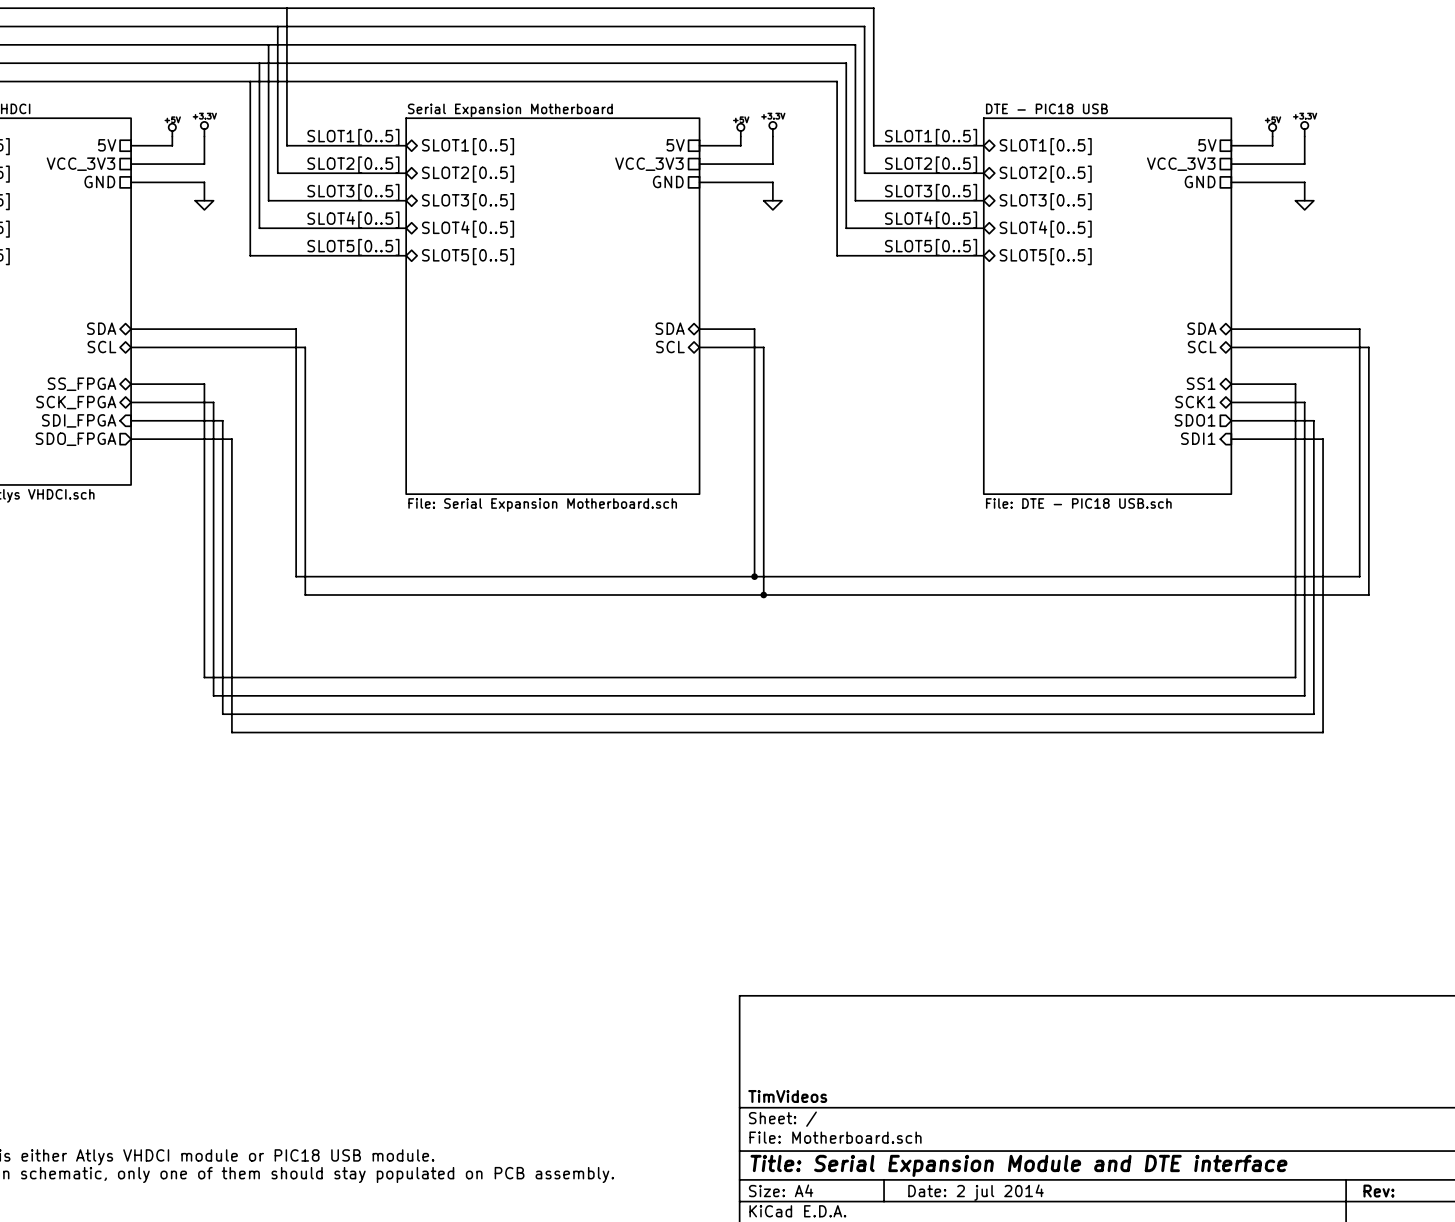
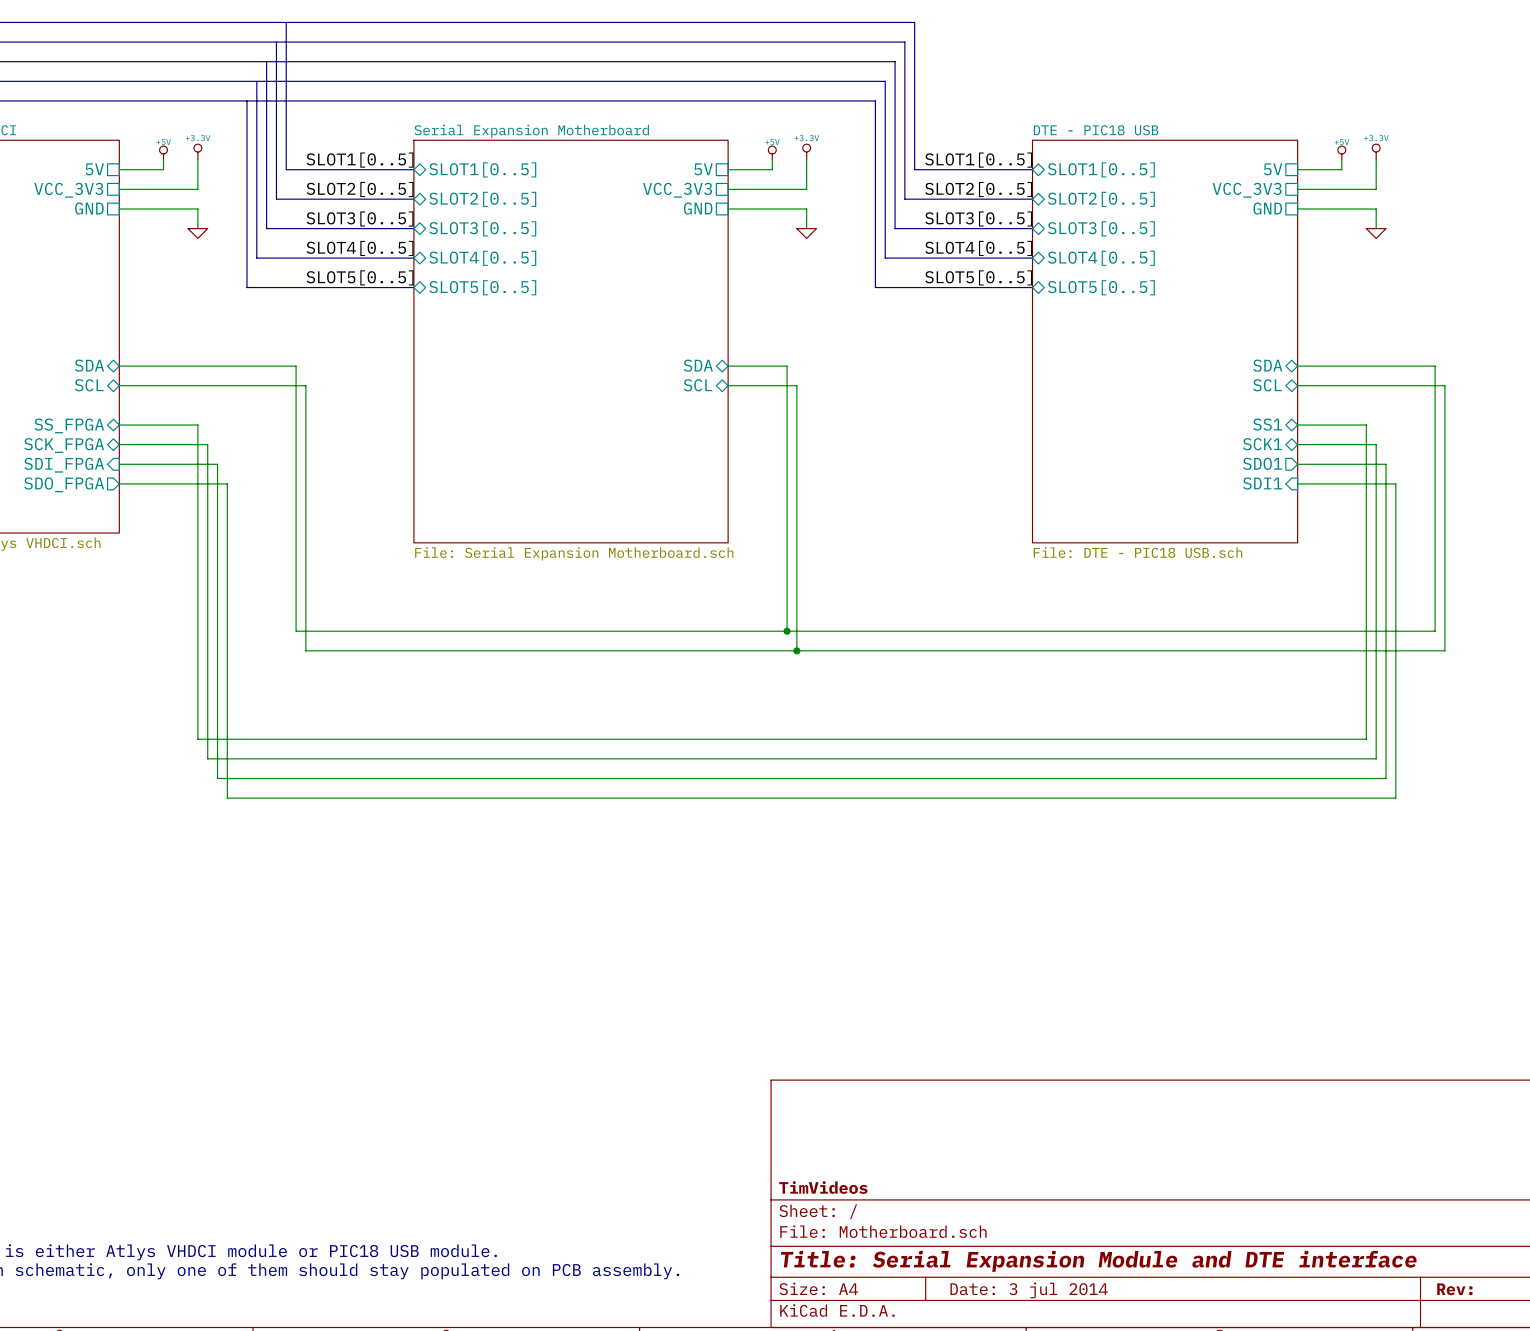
title block: Date: 2 jul 2014 (976, 1192) -> Date: 3 jul 2014 (1029, 1290)

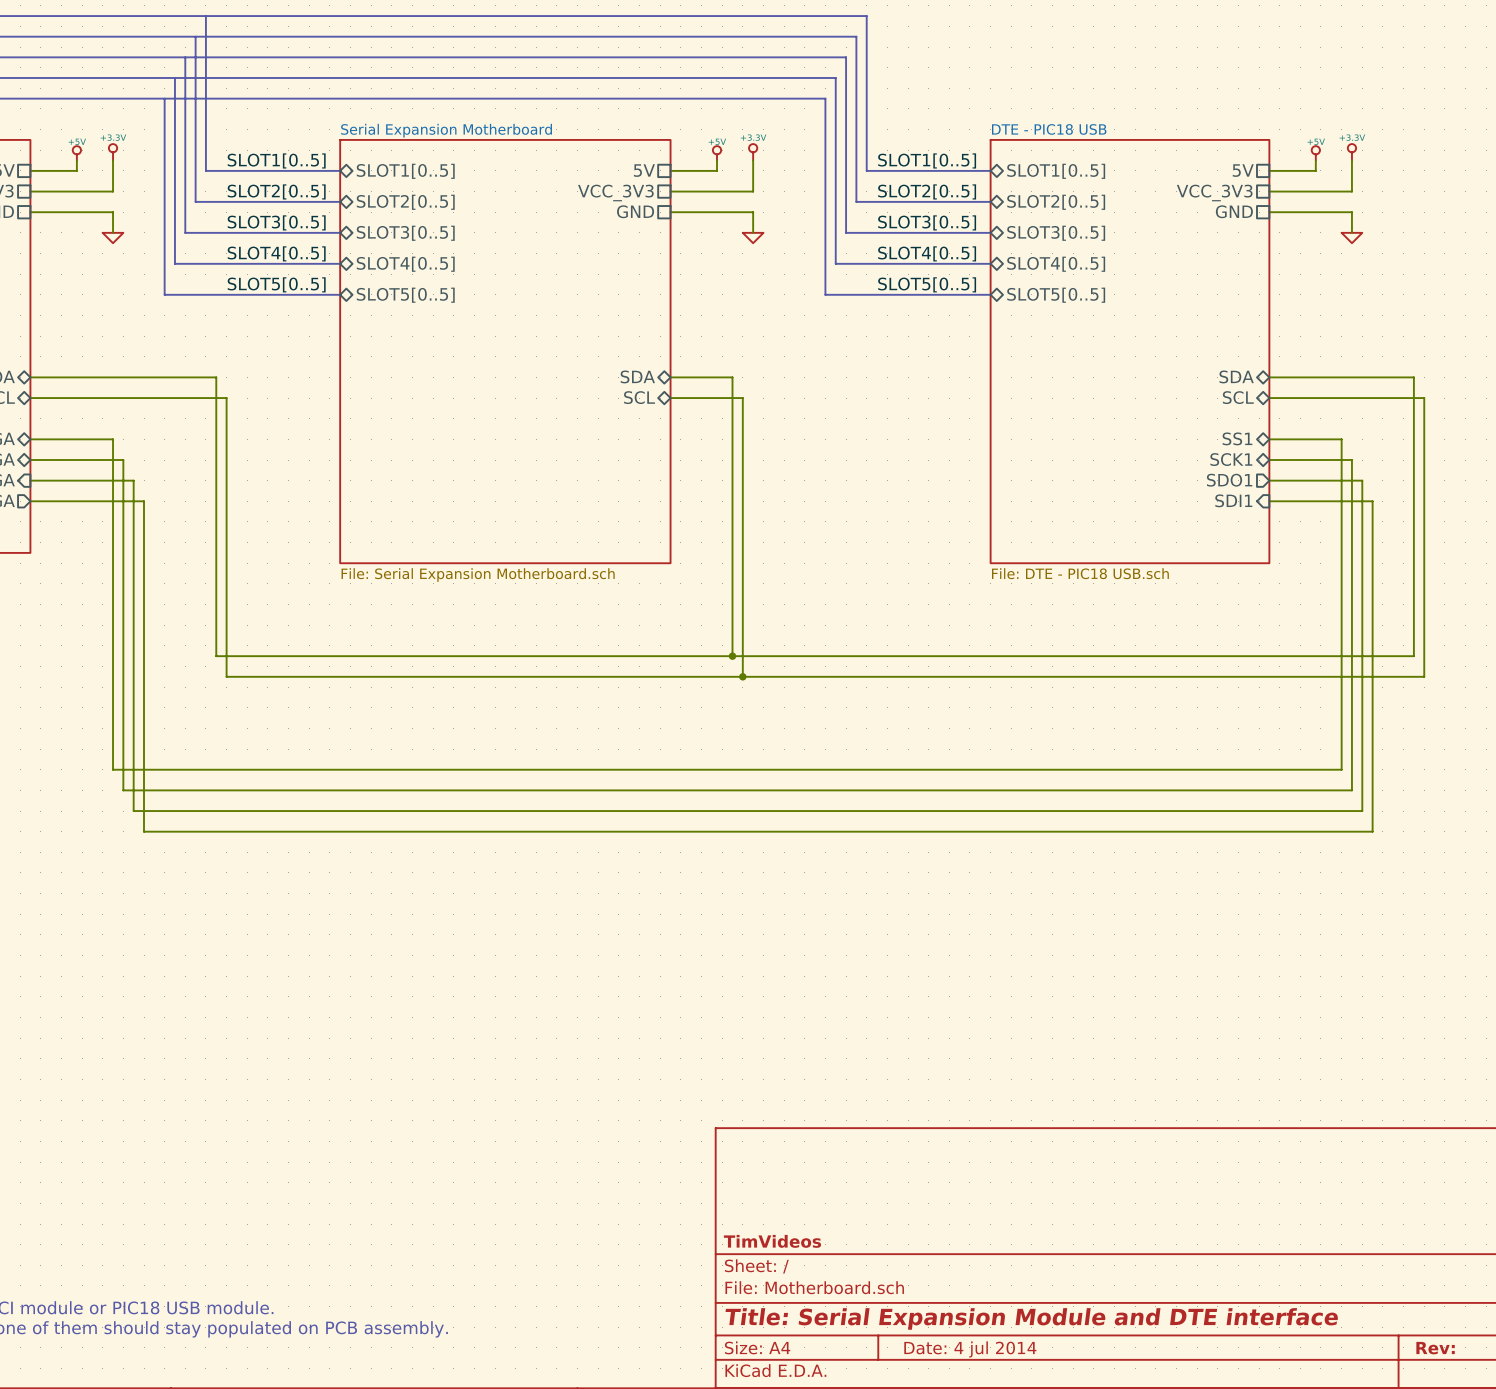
title block: Date: 3 jul 2014 (1029, 1290) -> Date: 4 jul 2014 (970, 1349)

